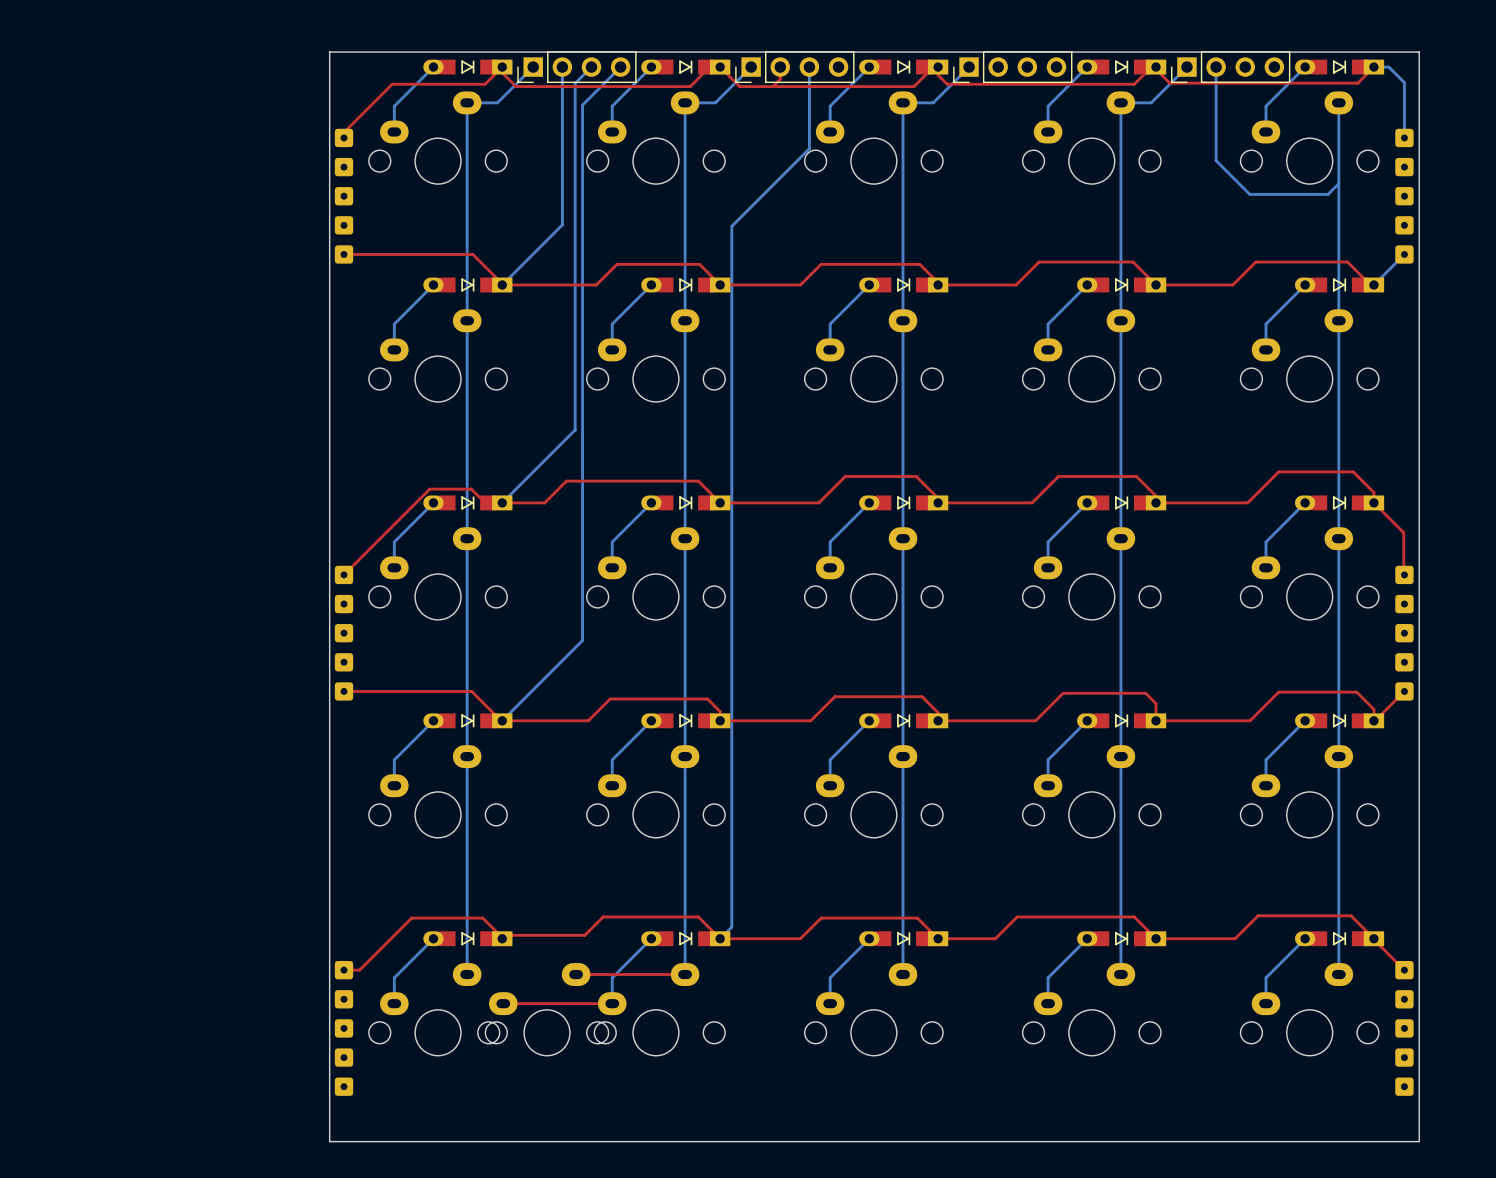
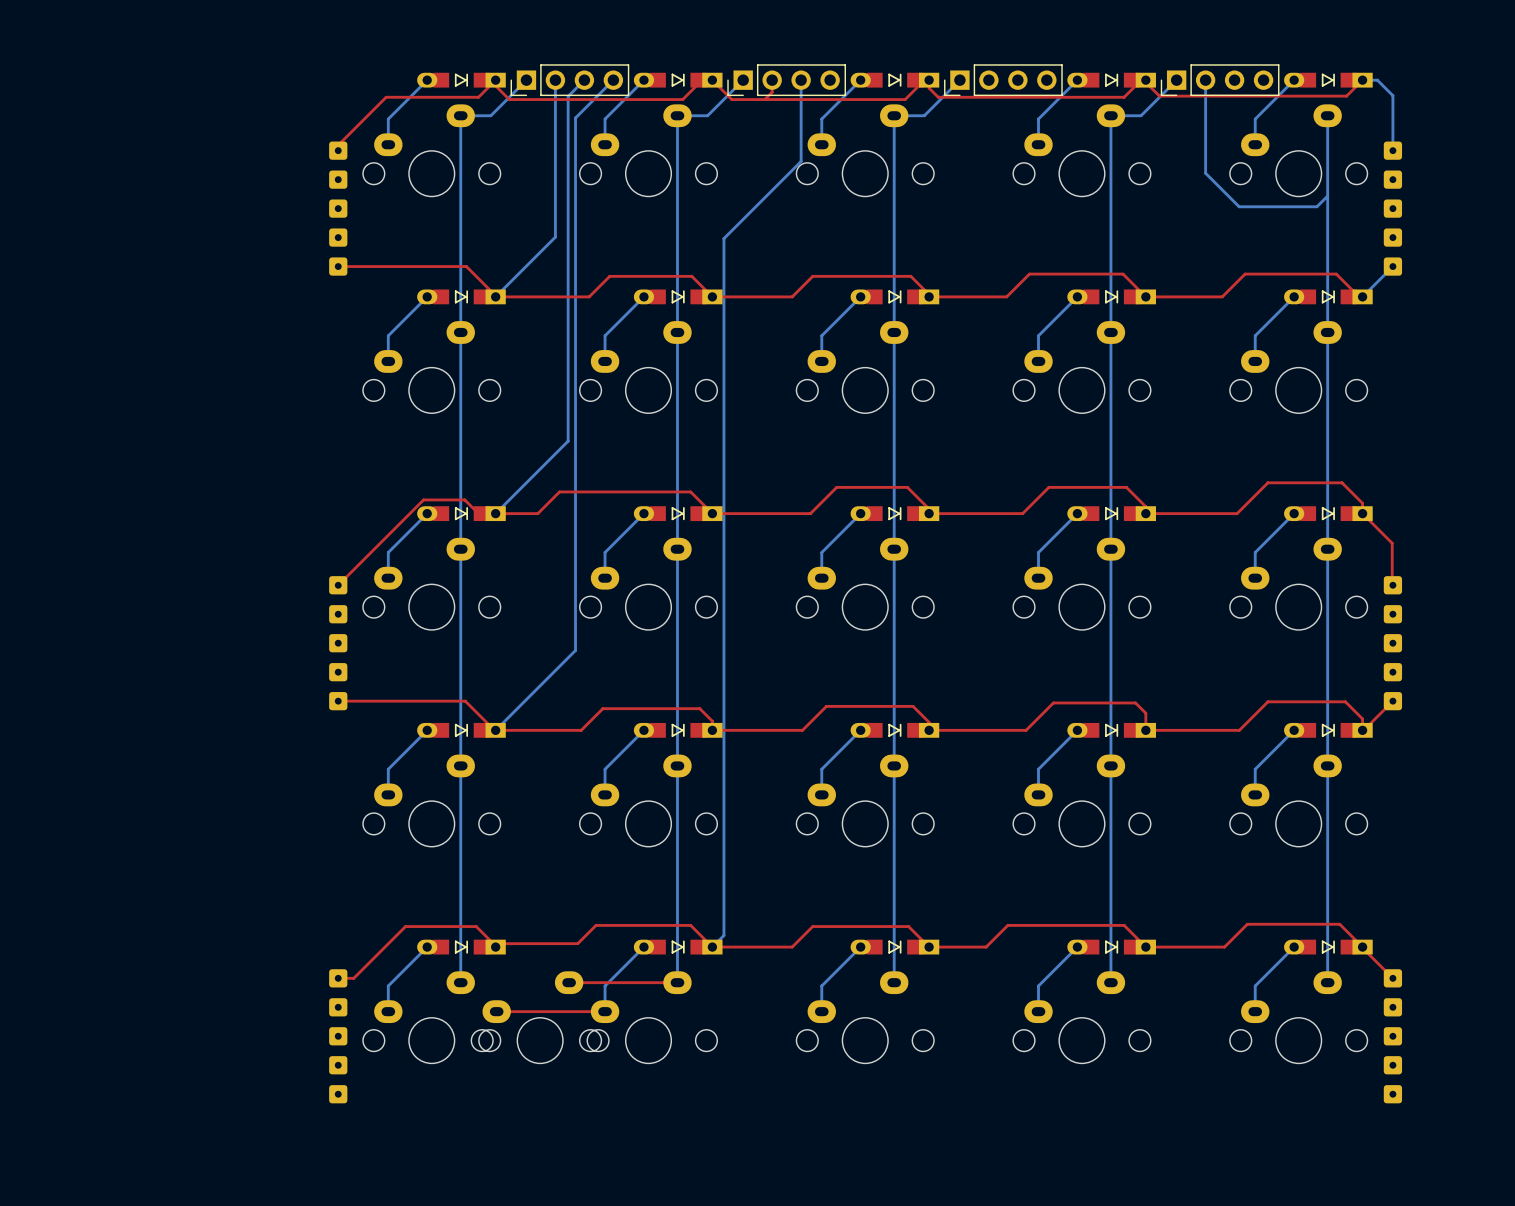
board edge: (329, 52) (329, 1141) (1419, 1141) (1419, 52) (329, 52) -> none

